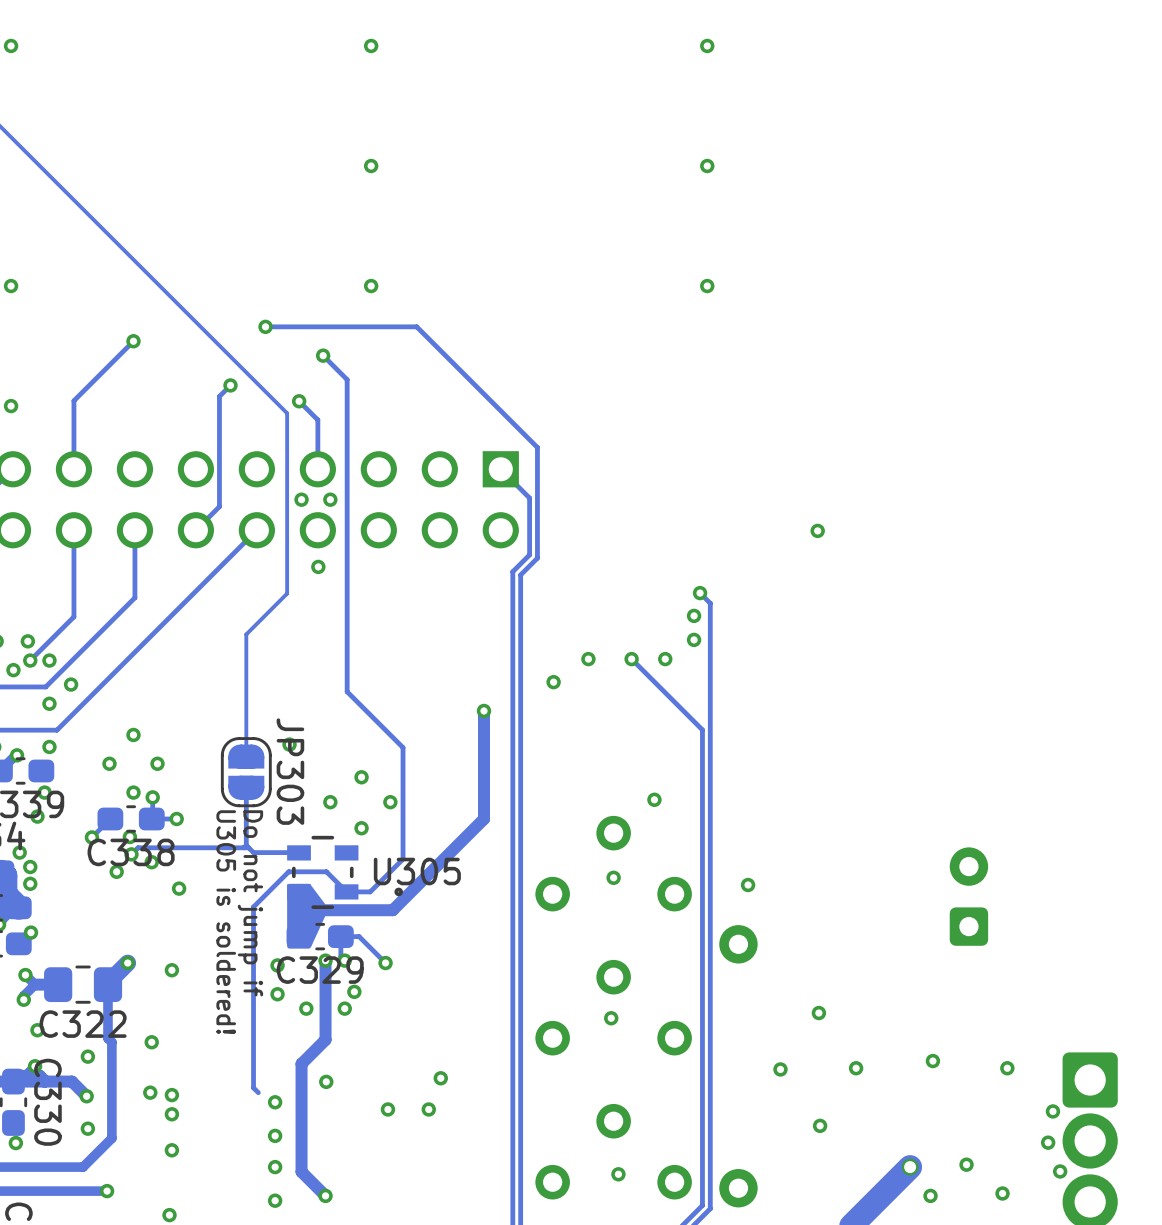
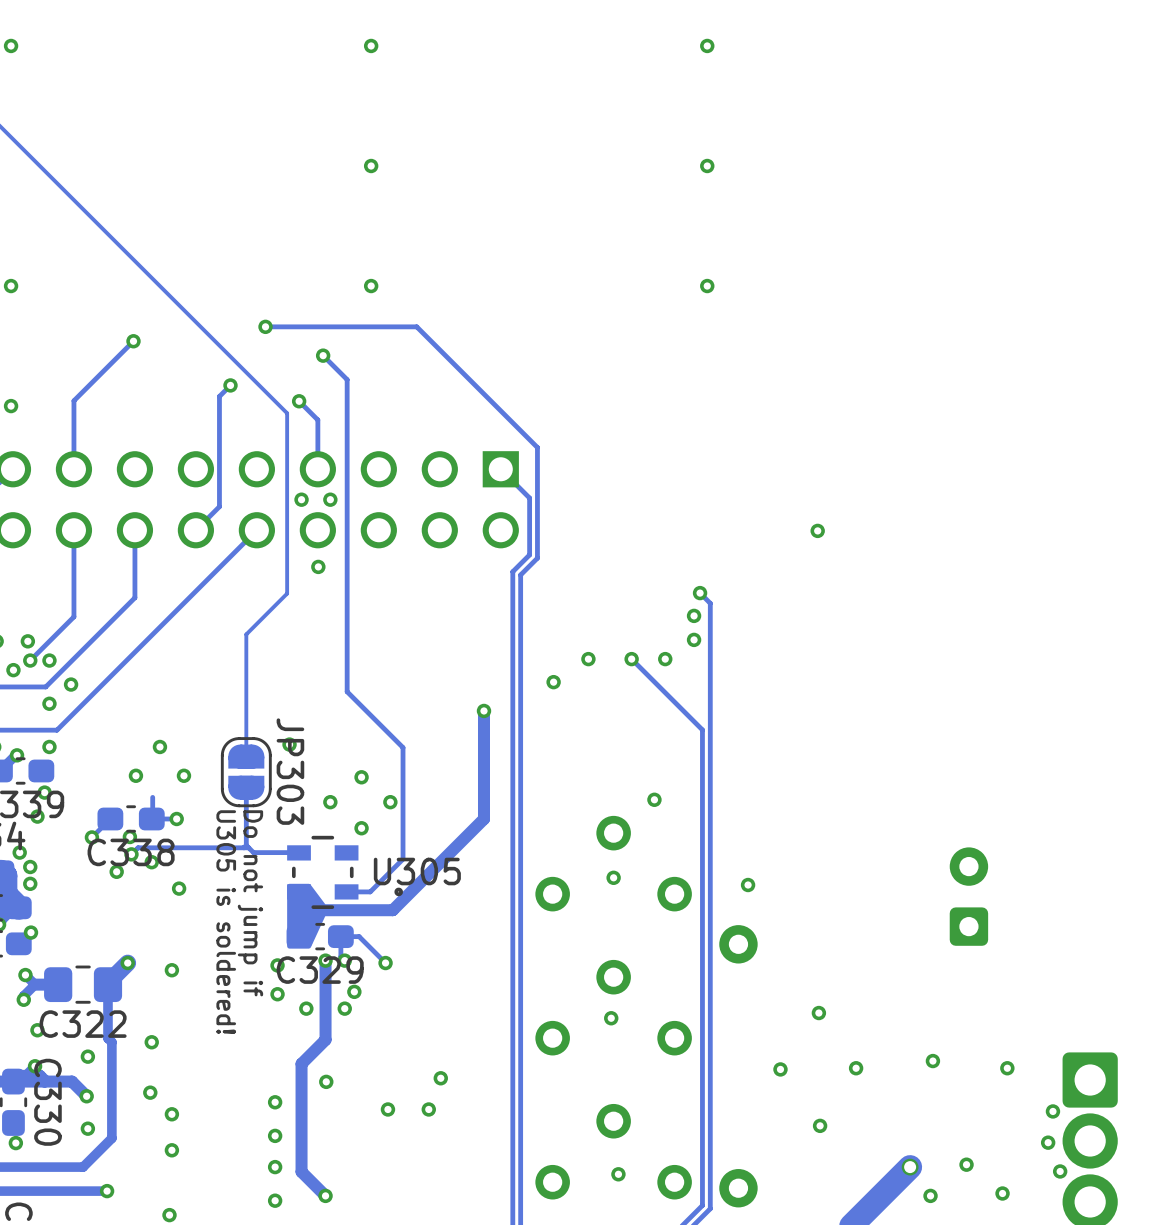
via: (133, 734) -> none
via: none -> (159, 746)
via: (109, 763) -> none
via: (157, 763) -> none
via: none -> (135, 775)
via: none -> (183, 775)
via: (133, 792) -> none
via: (152, 797) -> none
track: (346, 891) (326, 871) (288, 871) (253, 906) (253, 1087) (258, 1092) -> none
via: (171, 1095) -> none

